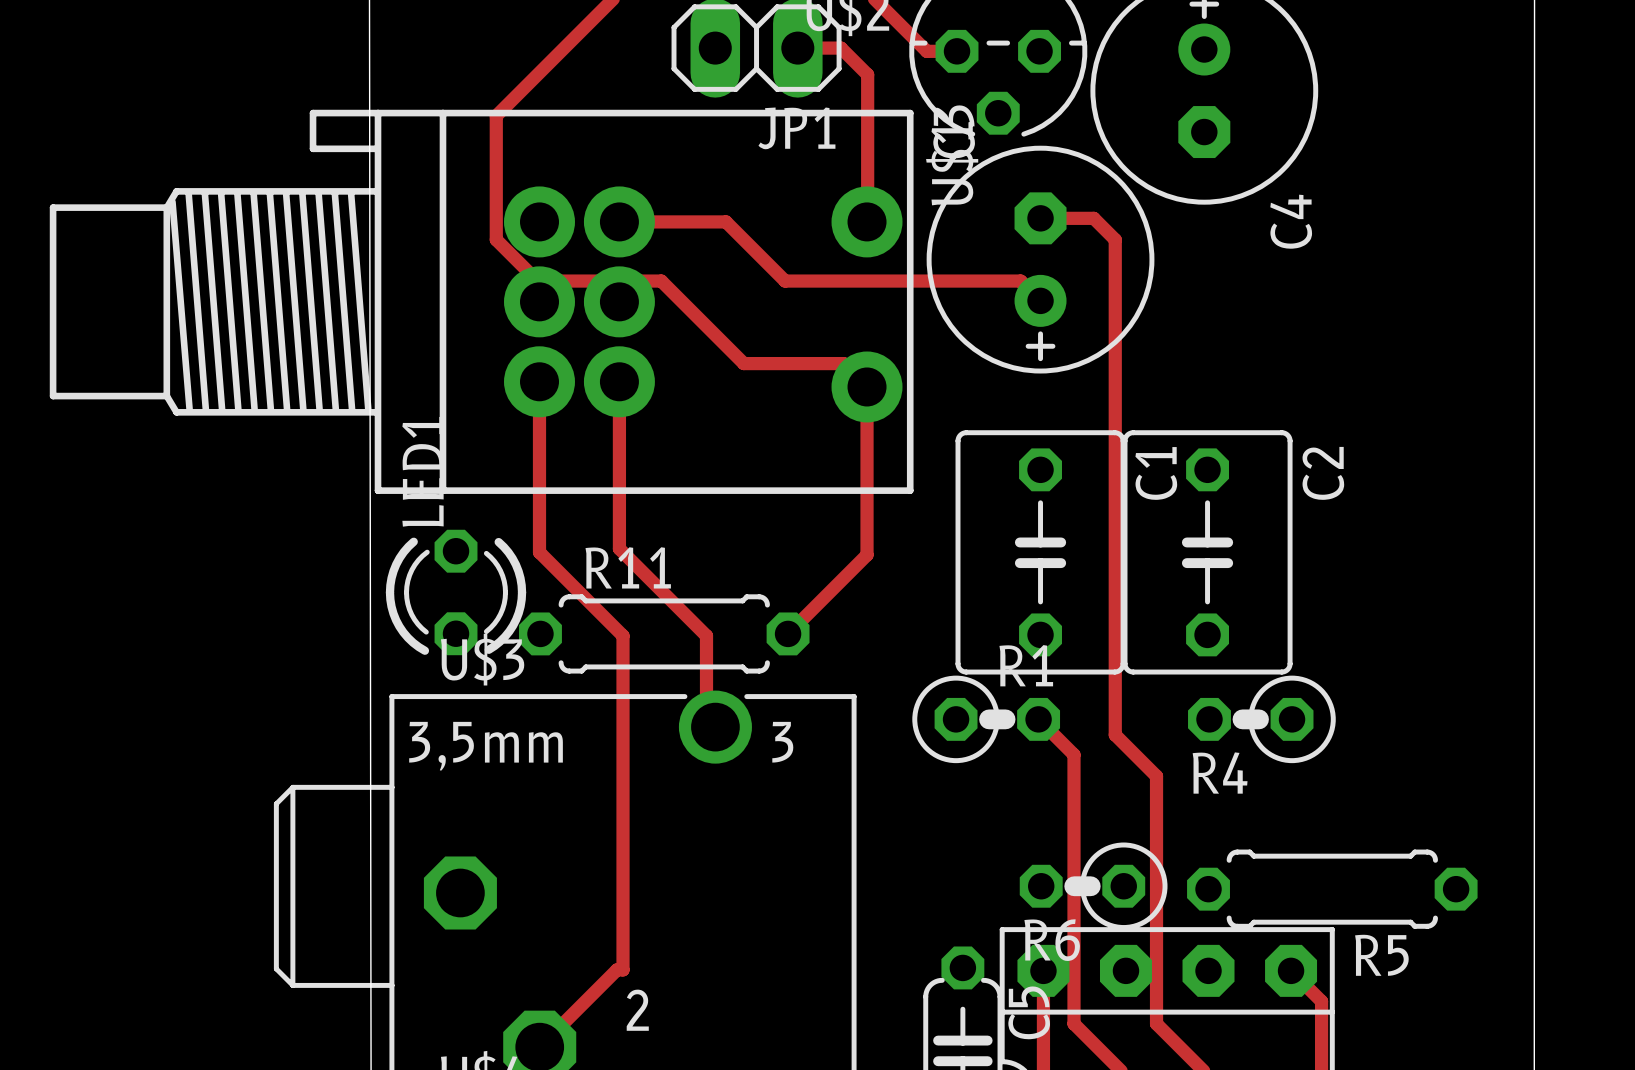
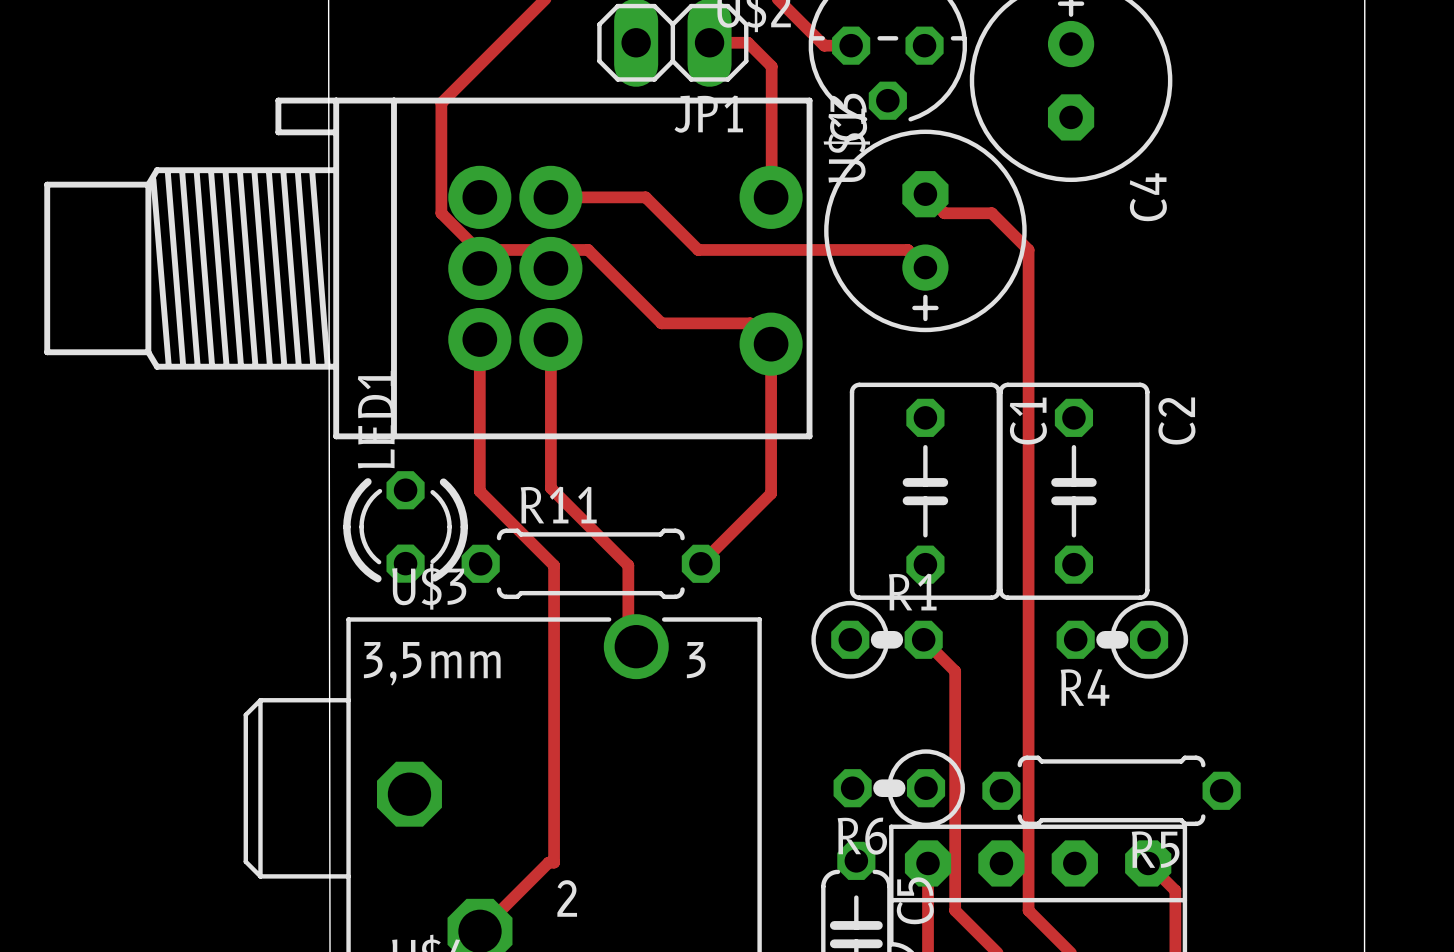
track: (1040, 218) (1093, 218) (1115, 239) (1115, 734) (1156, 776) -> (925, 194) (944, 213) (991, 213) (1028, 249) (1028, 690)
R6 position: (1093, 886) -> (899, 788)
R5 position: (1332, 889) -> (1111, 790)

